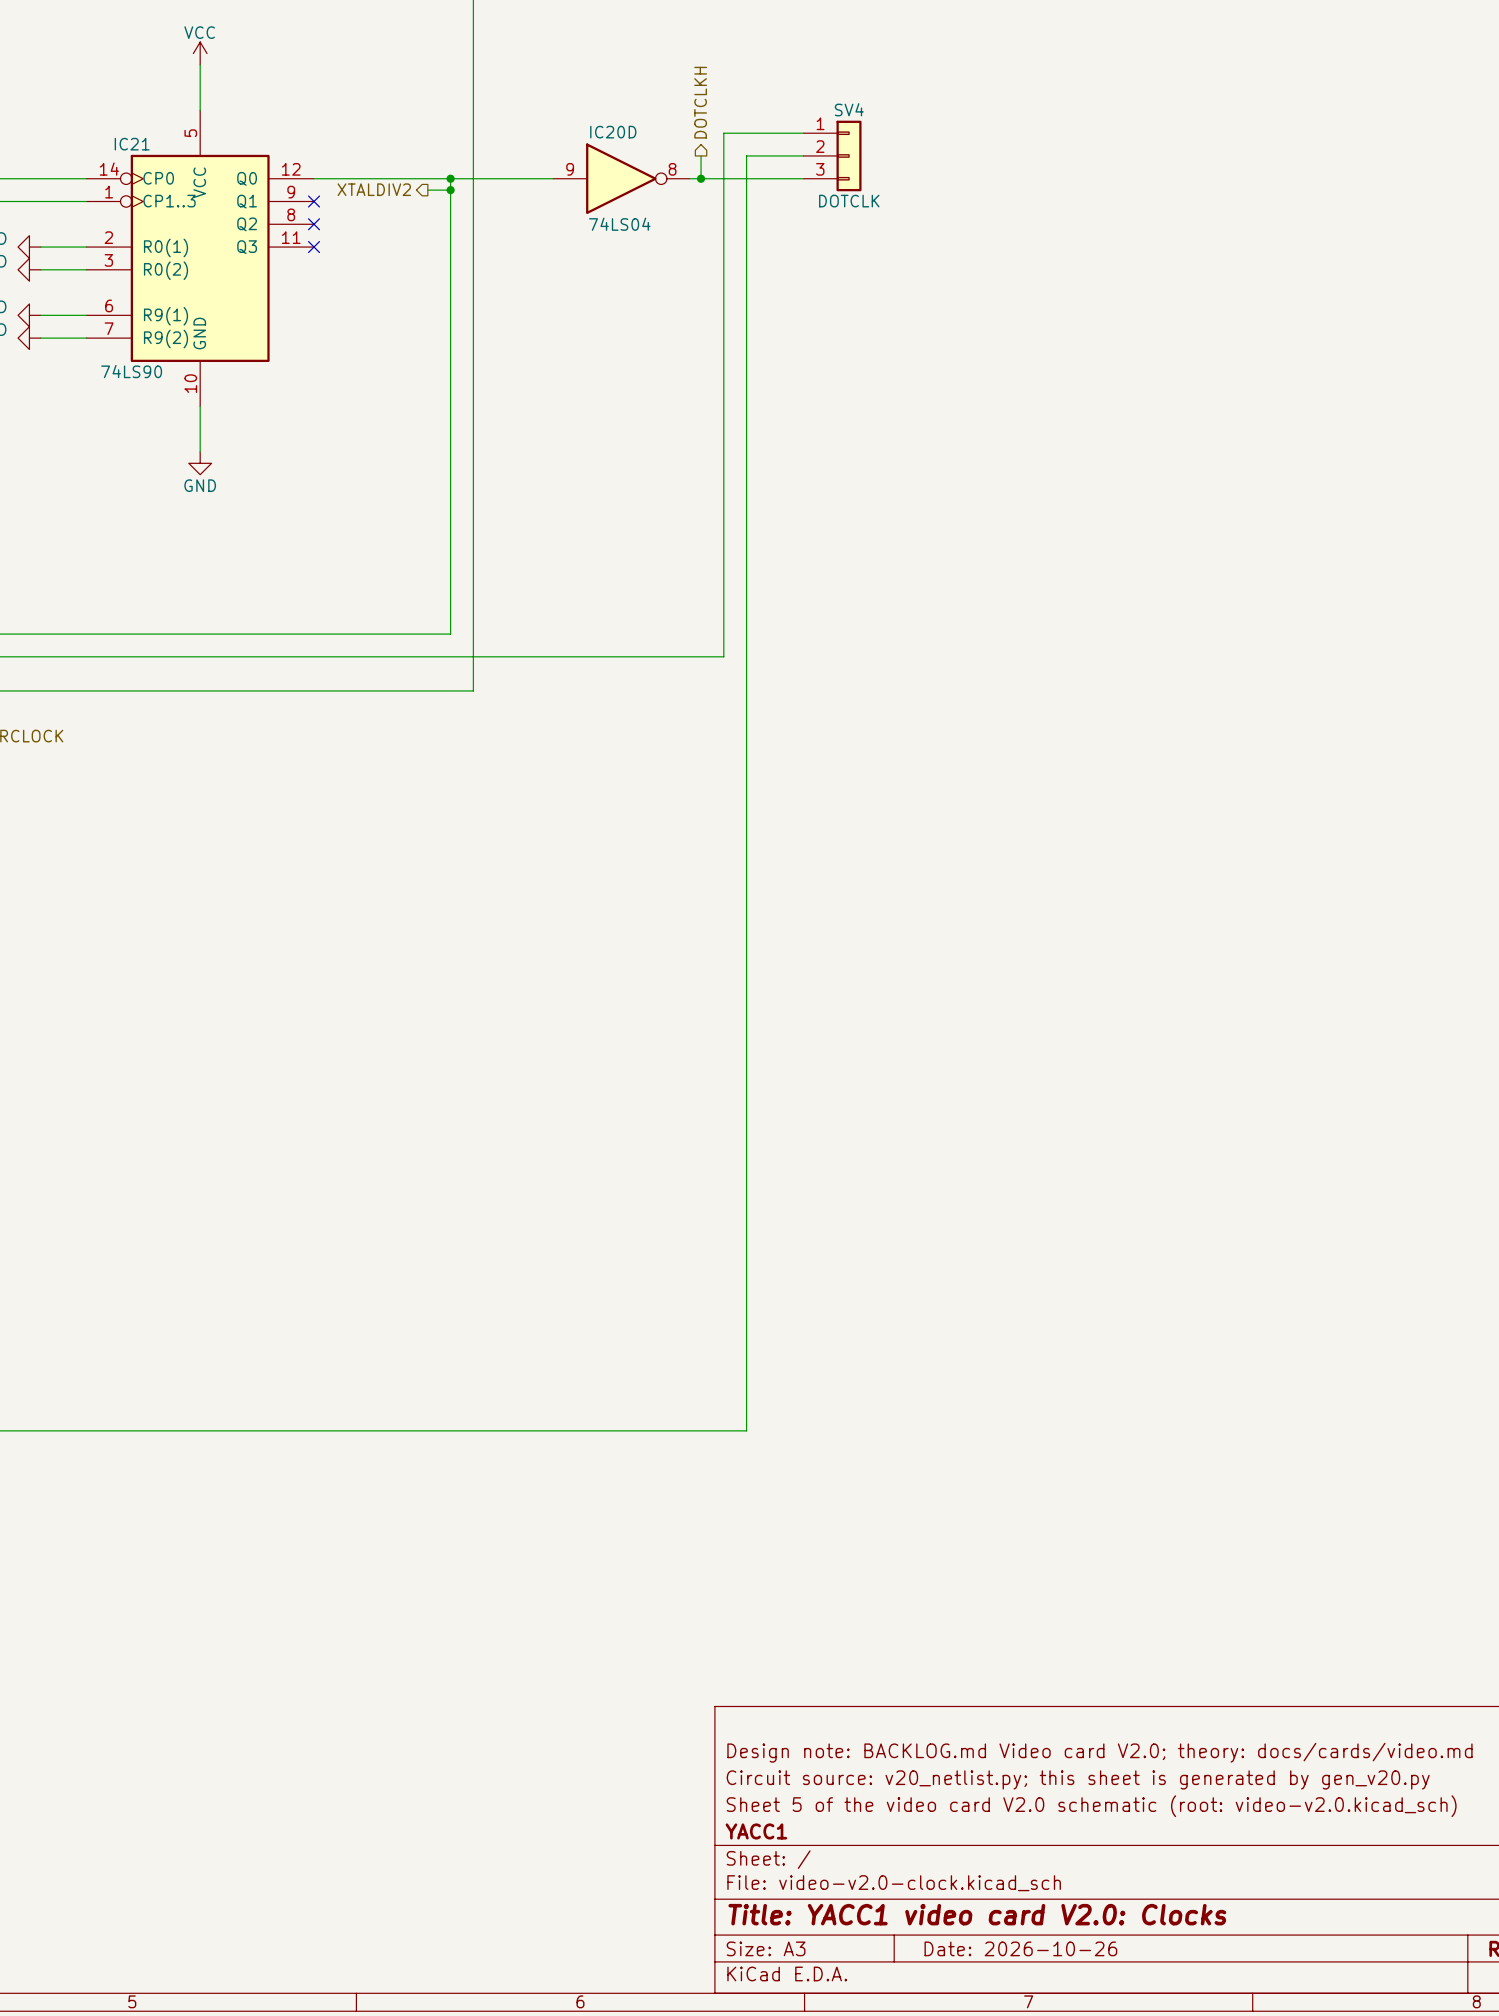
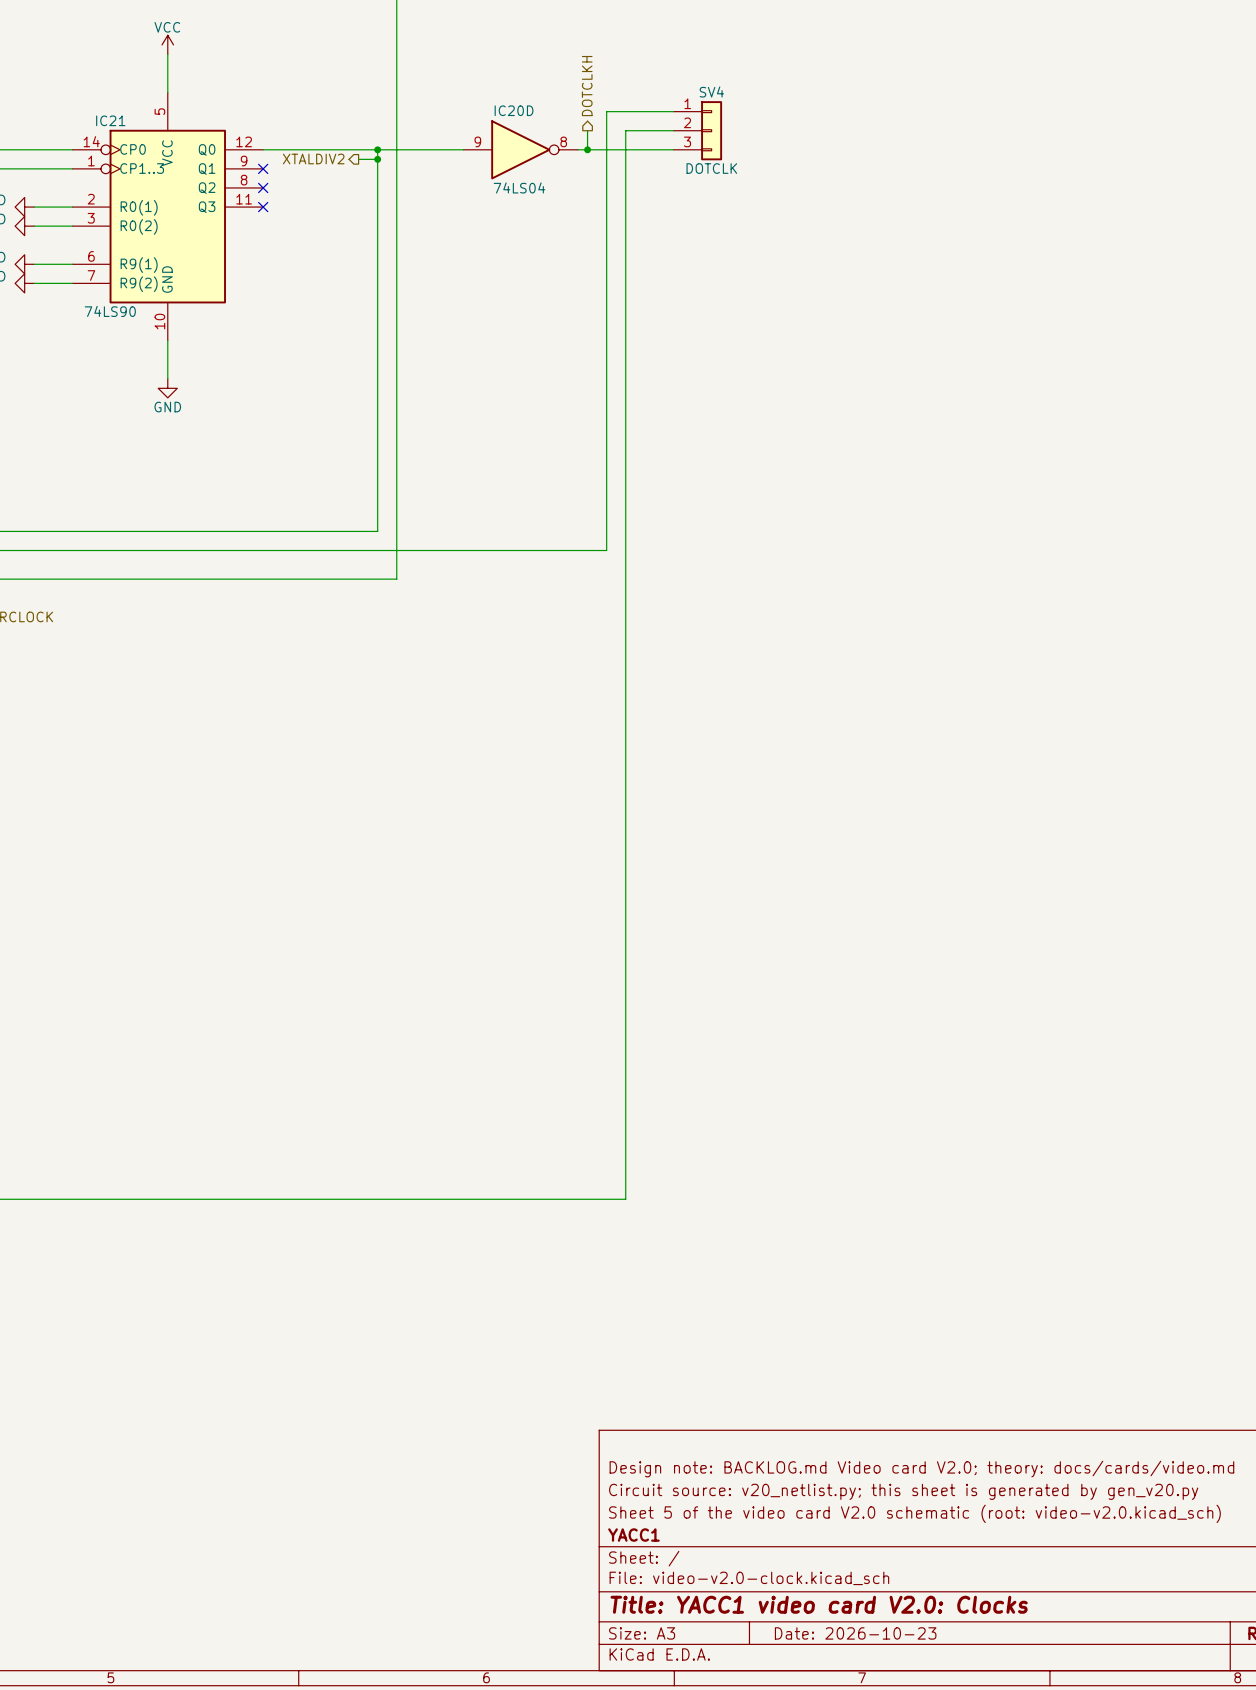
title block: Date: 2026-10-26 (1020, 1948) -> Date: 2026-10-23 (855, 1633)

